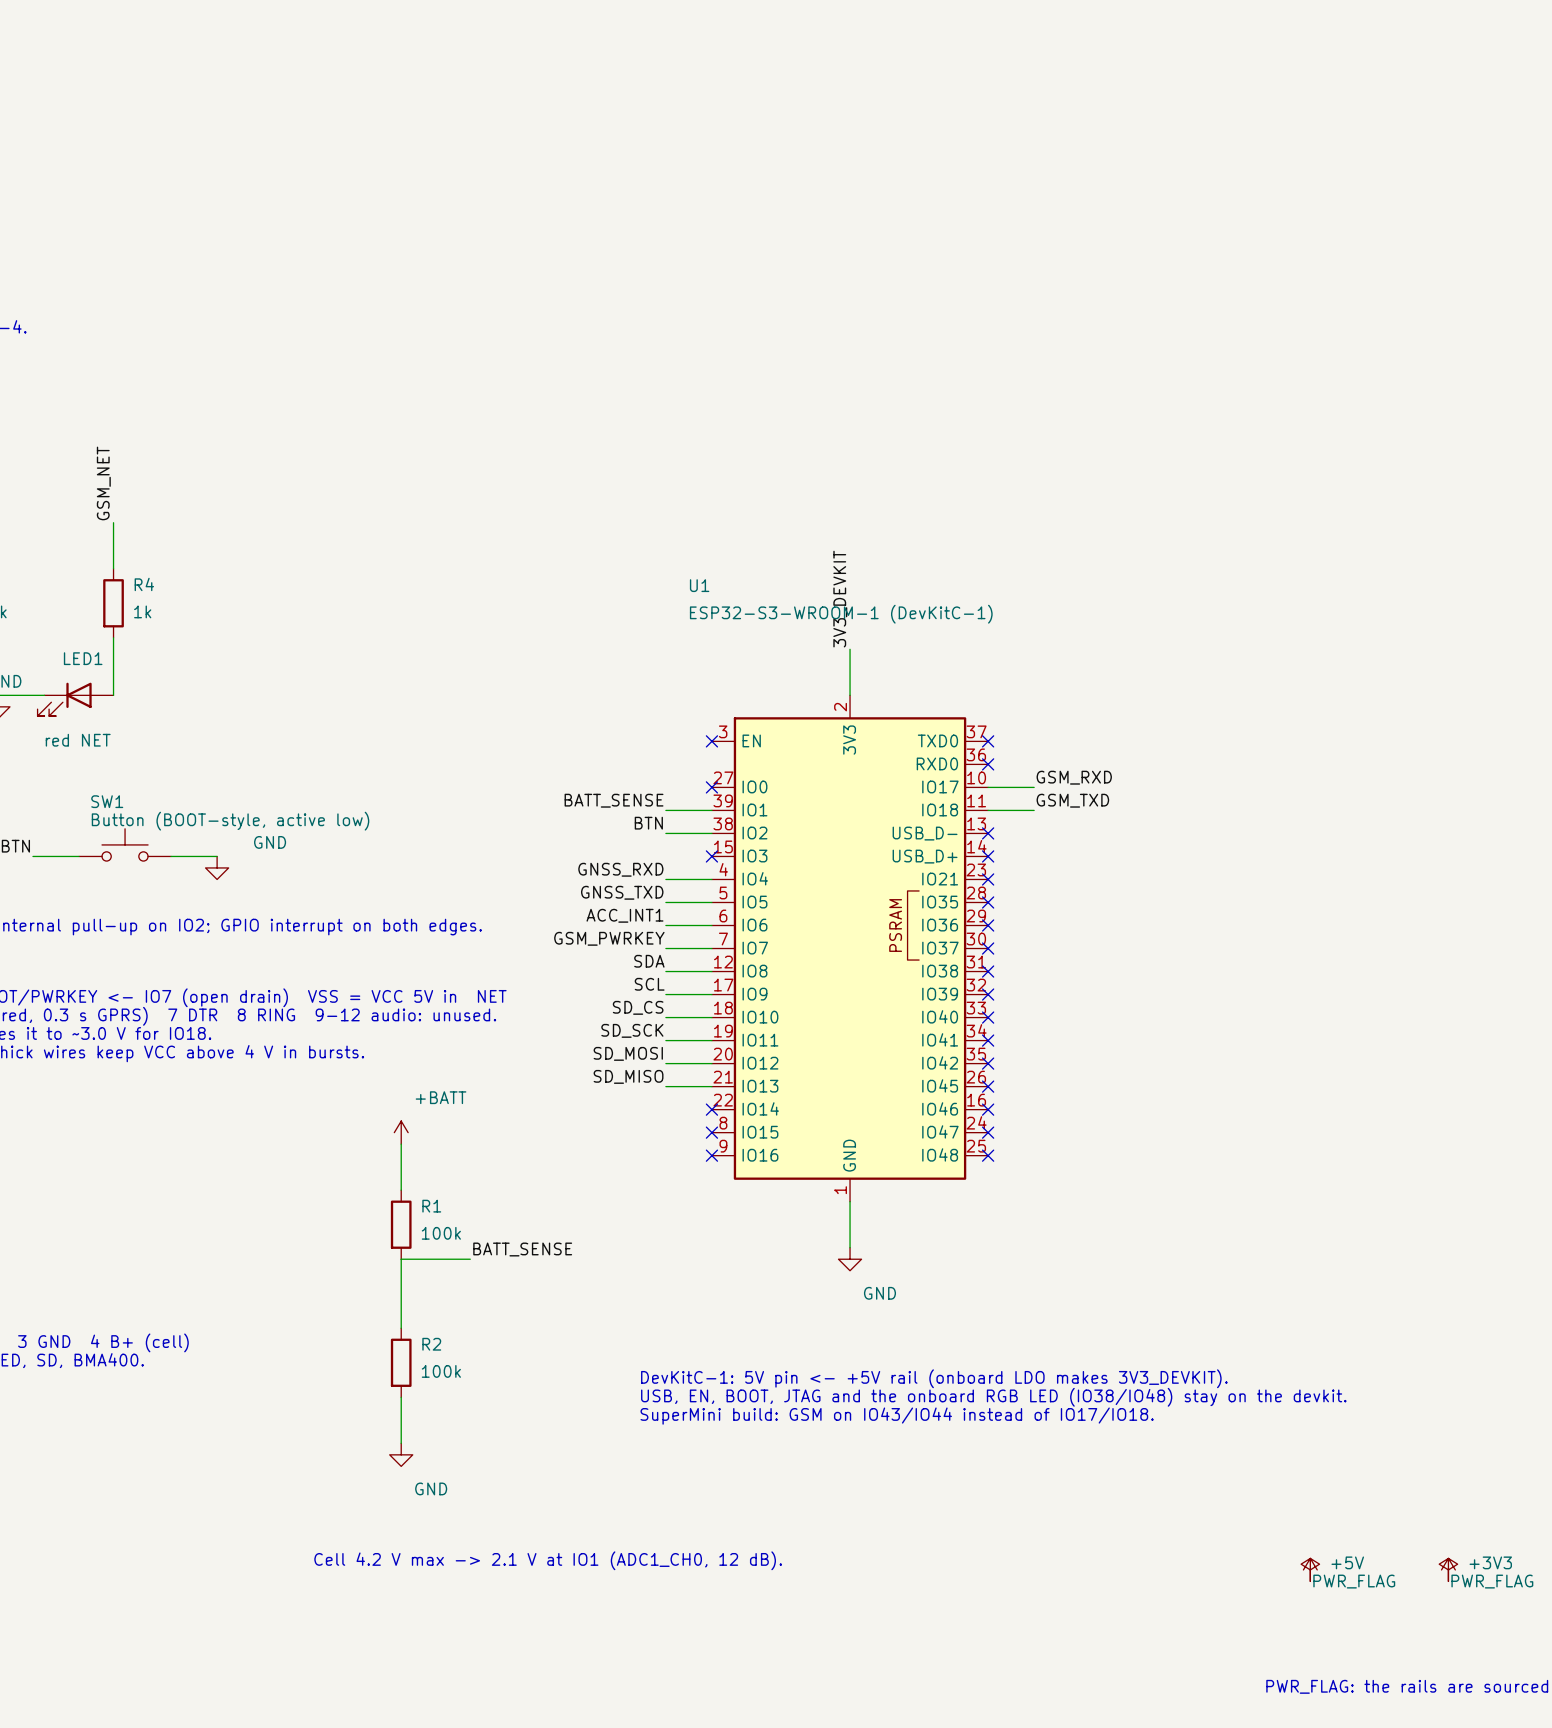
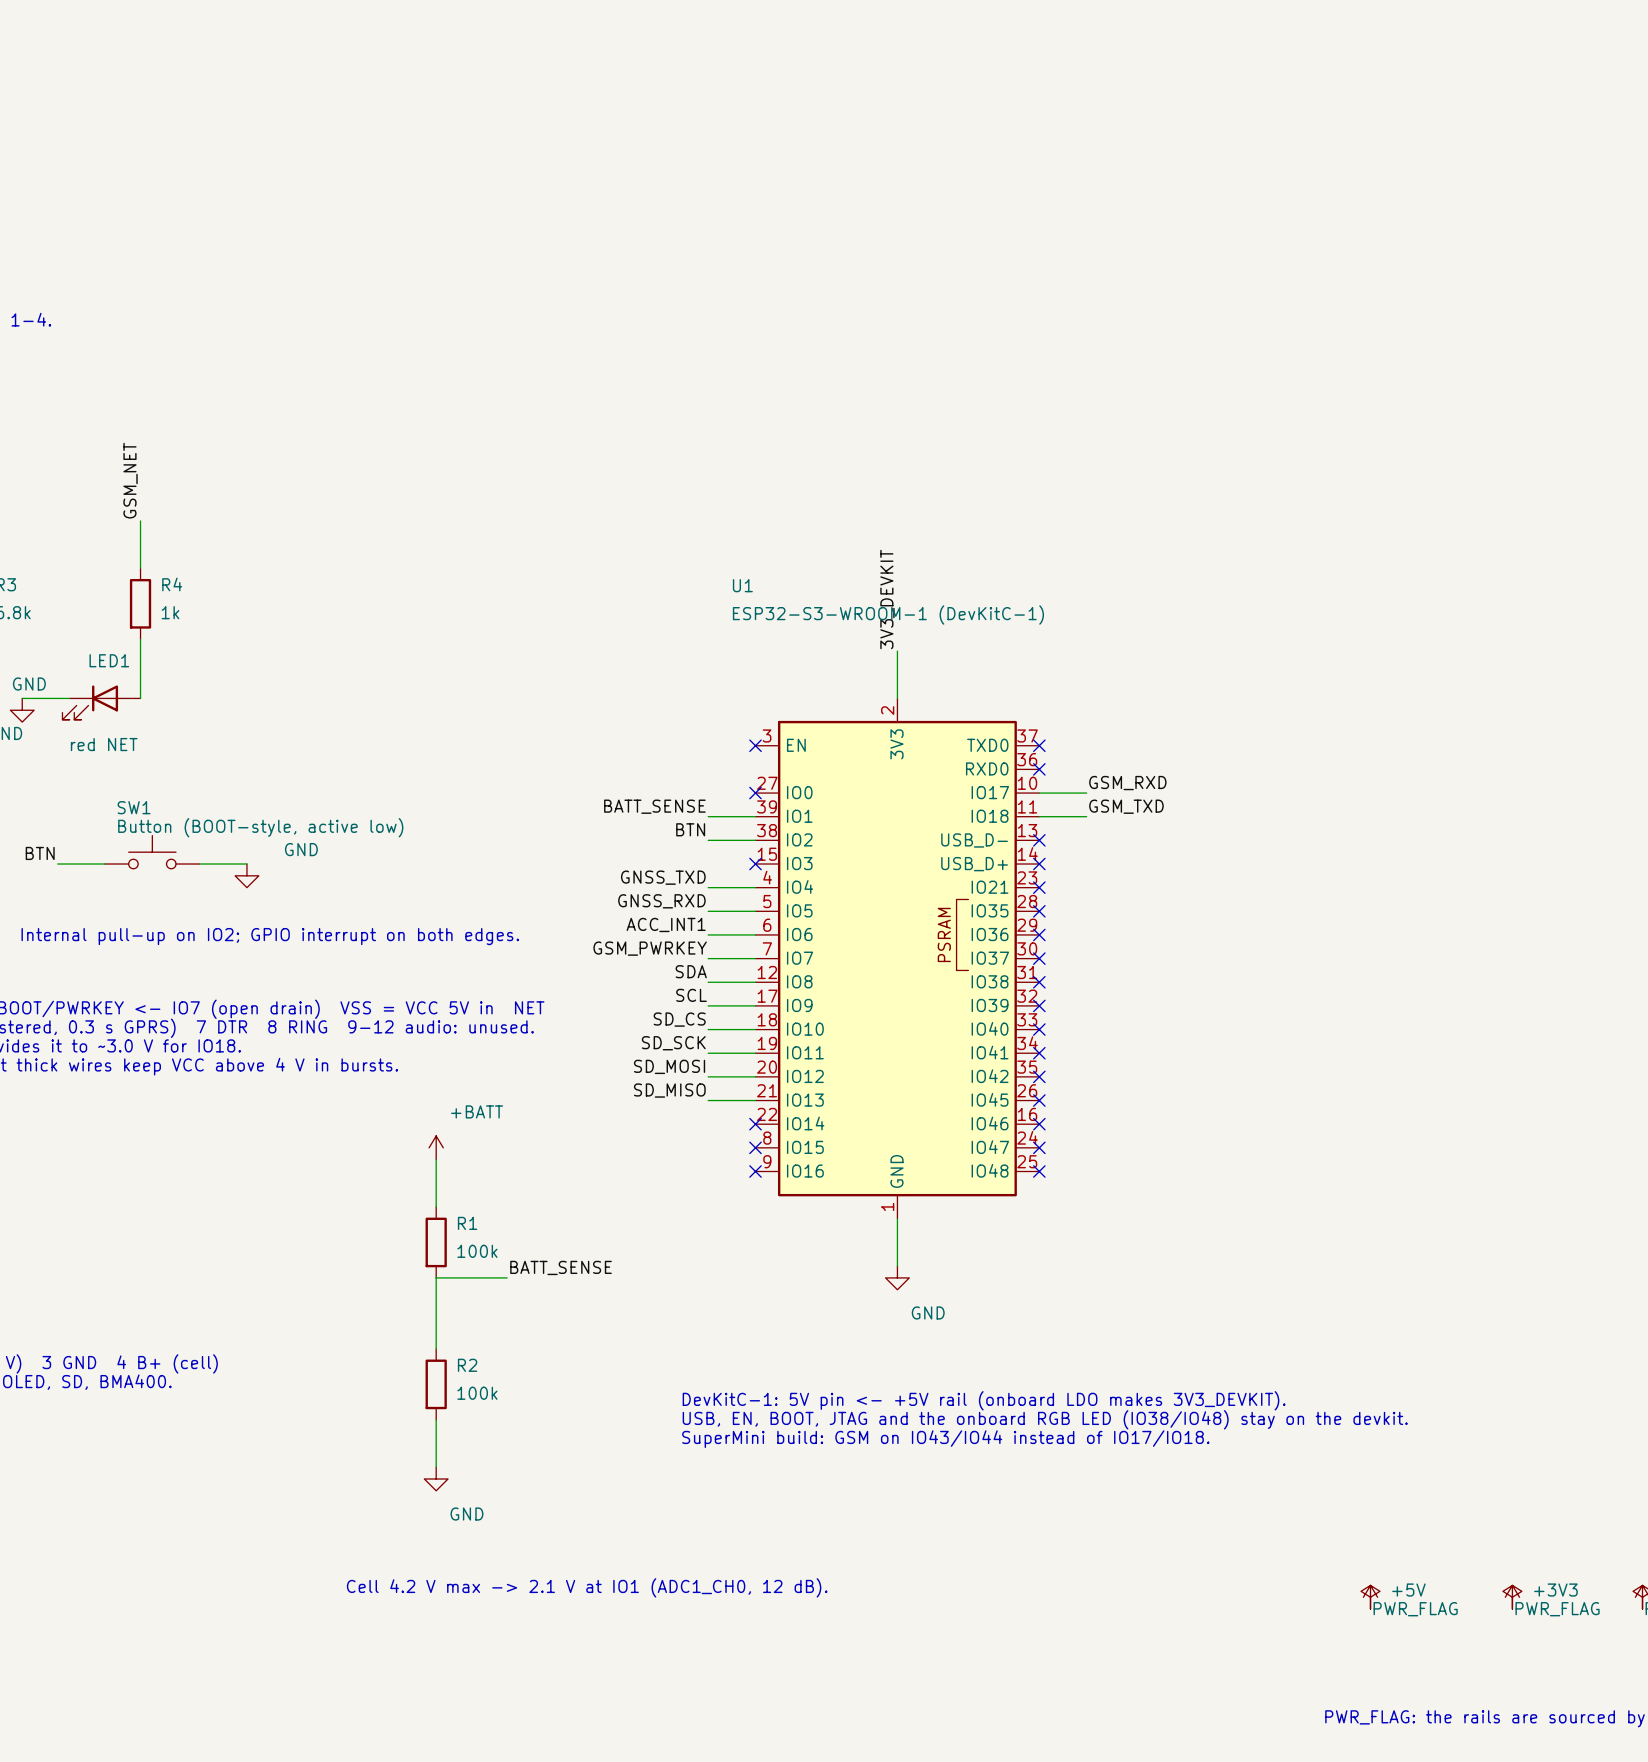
label: GNSS_RXD (620, 869) -> GNSS_TXD (663, 877)
label: GNSS_TXD (622, 892) -> GNSS_RXD (661, 901)

